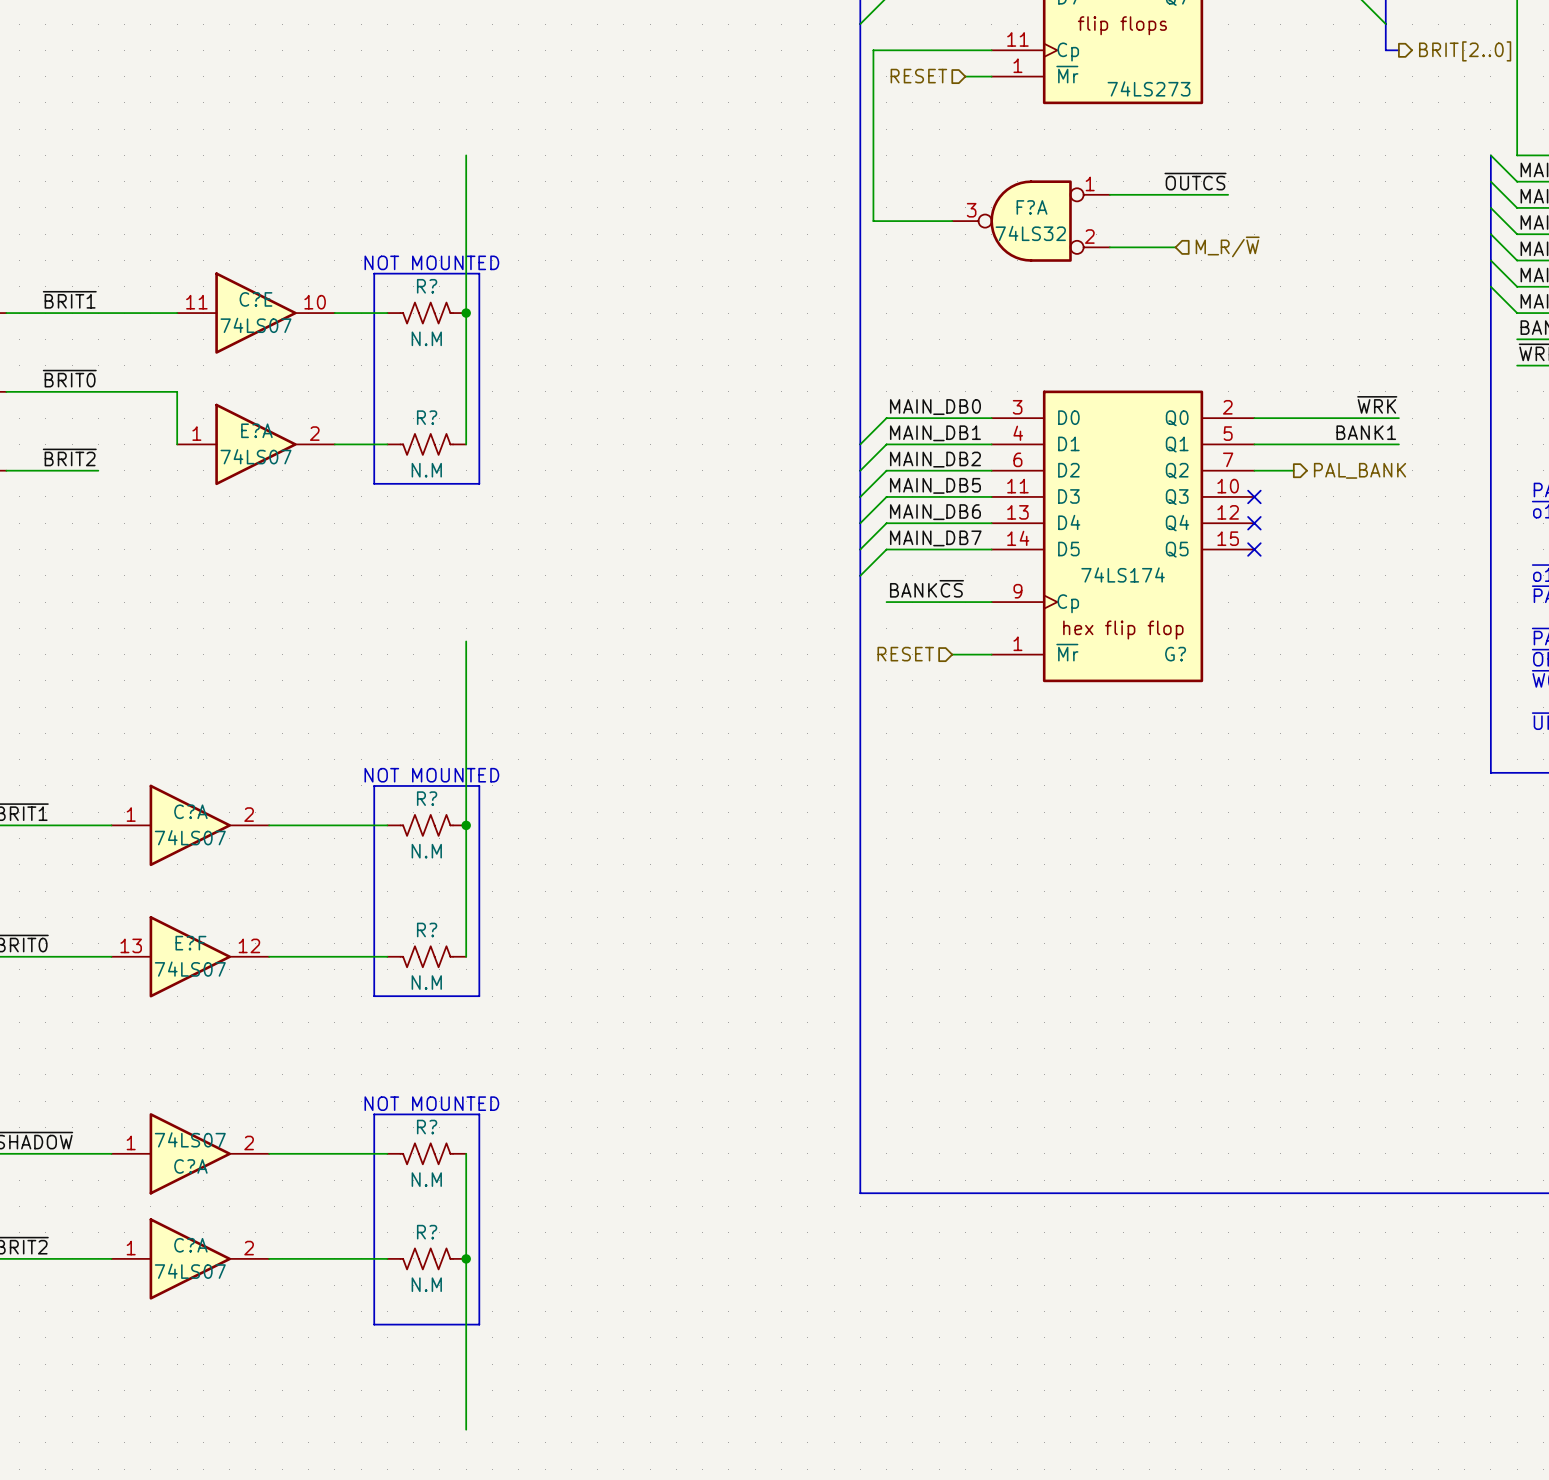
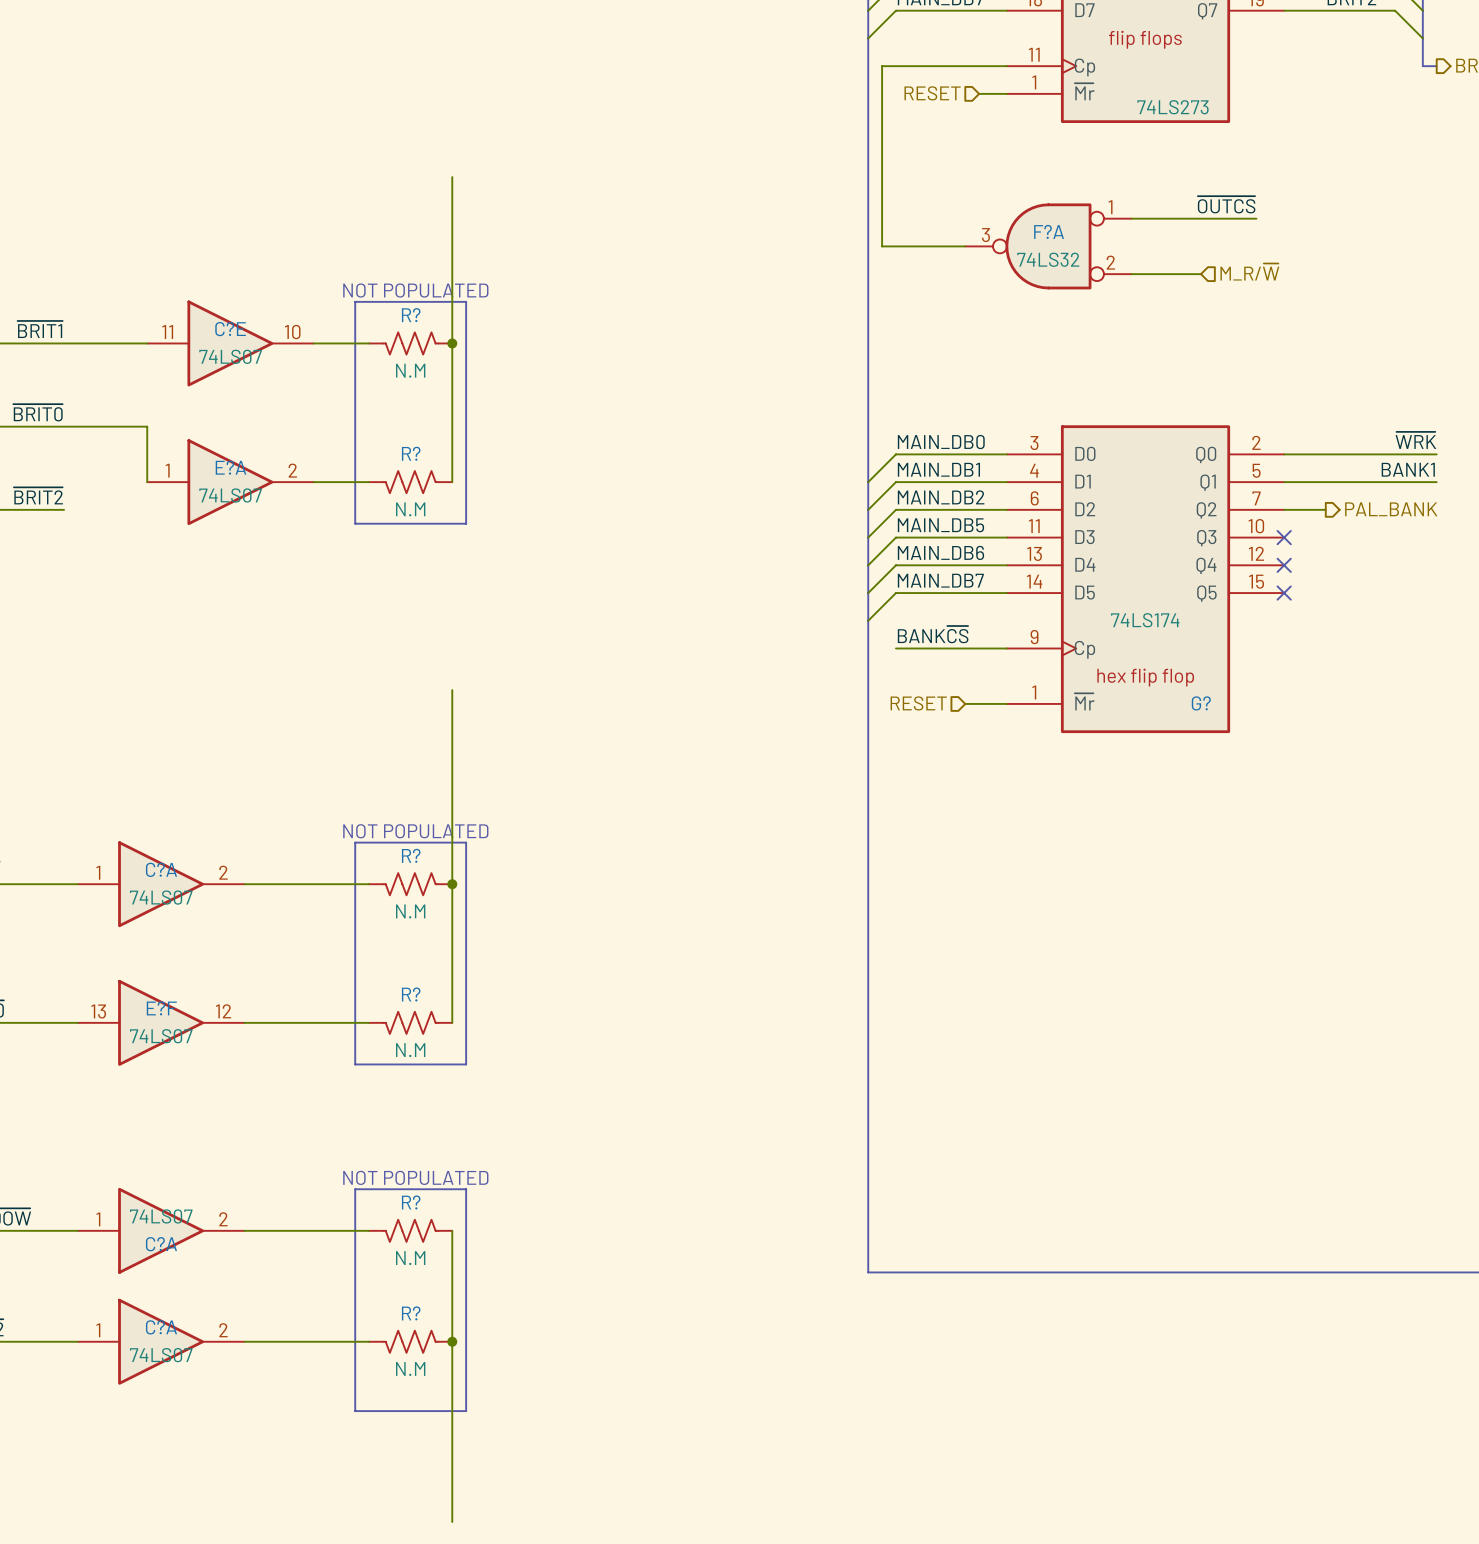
text: NOT MOUNTED (431, 262) -> NOT POPULATED (415, 290)
text: NOT MOUNTED (431, 775) -> NOT POPULATED (415, 831)
text: NOT MOUNTED (431, 1103) -> NOT POPULATED (415, 1177)

